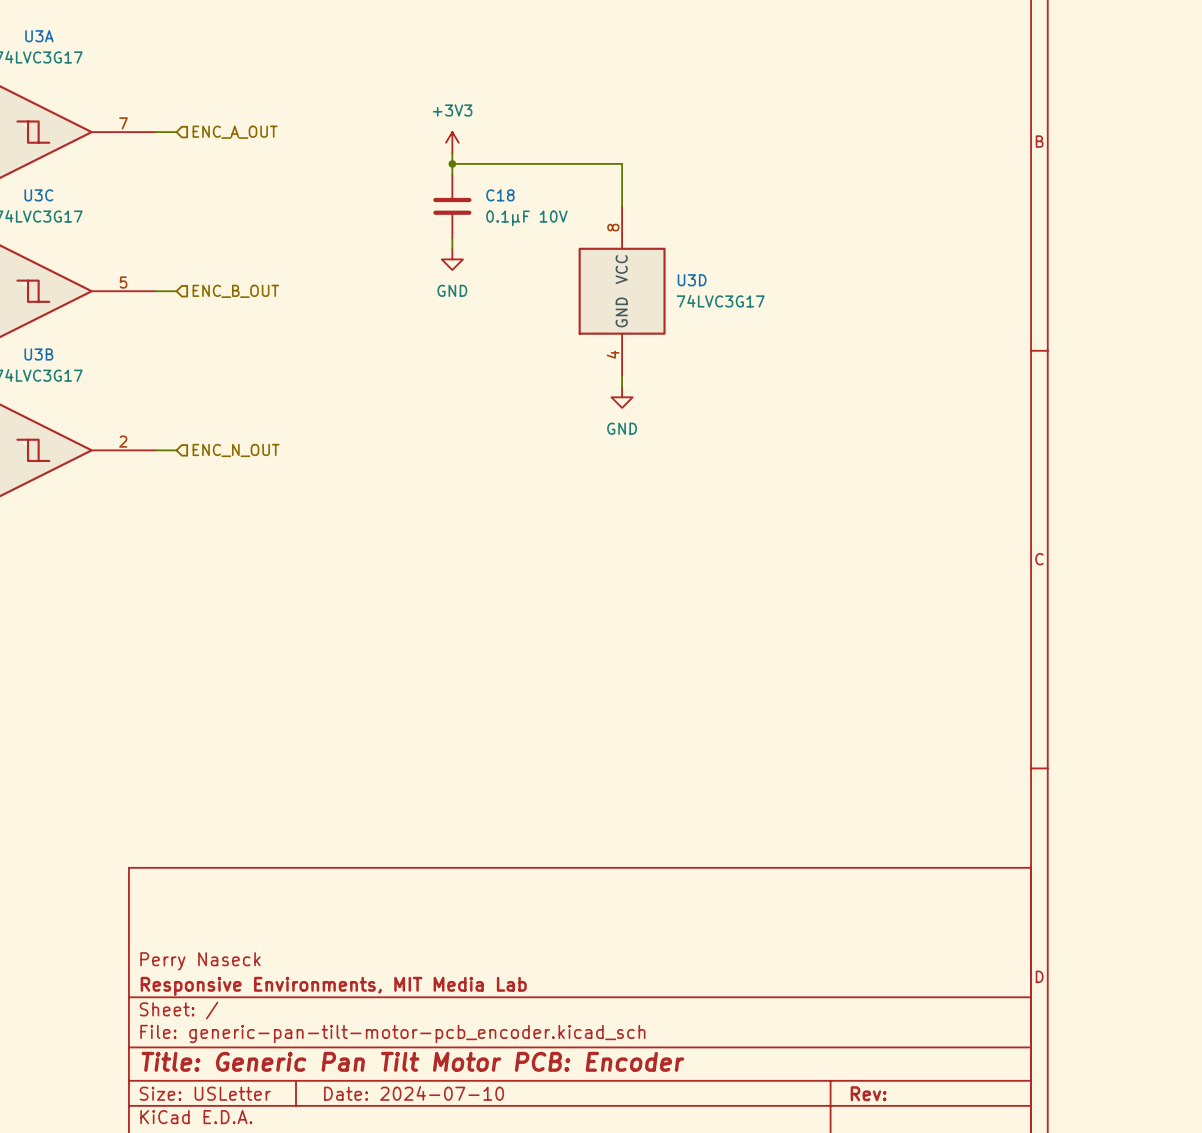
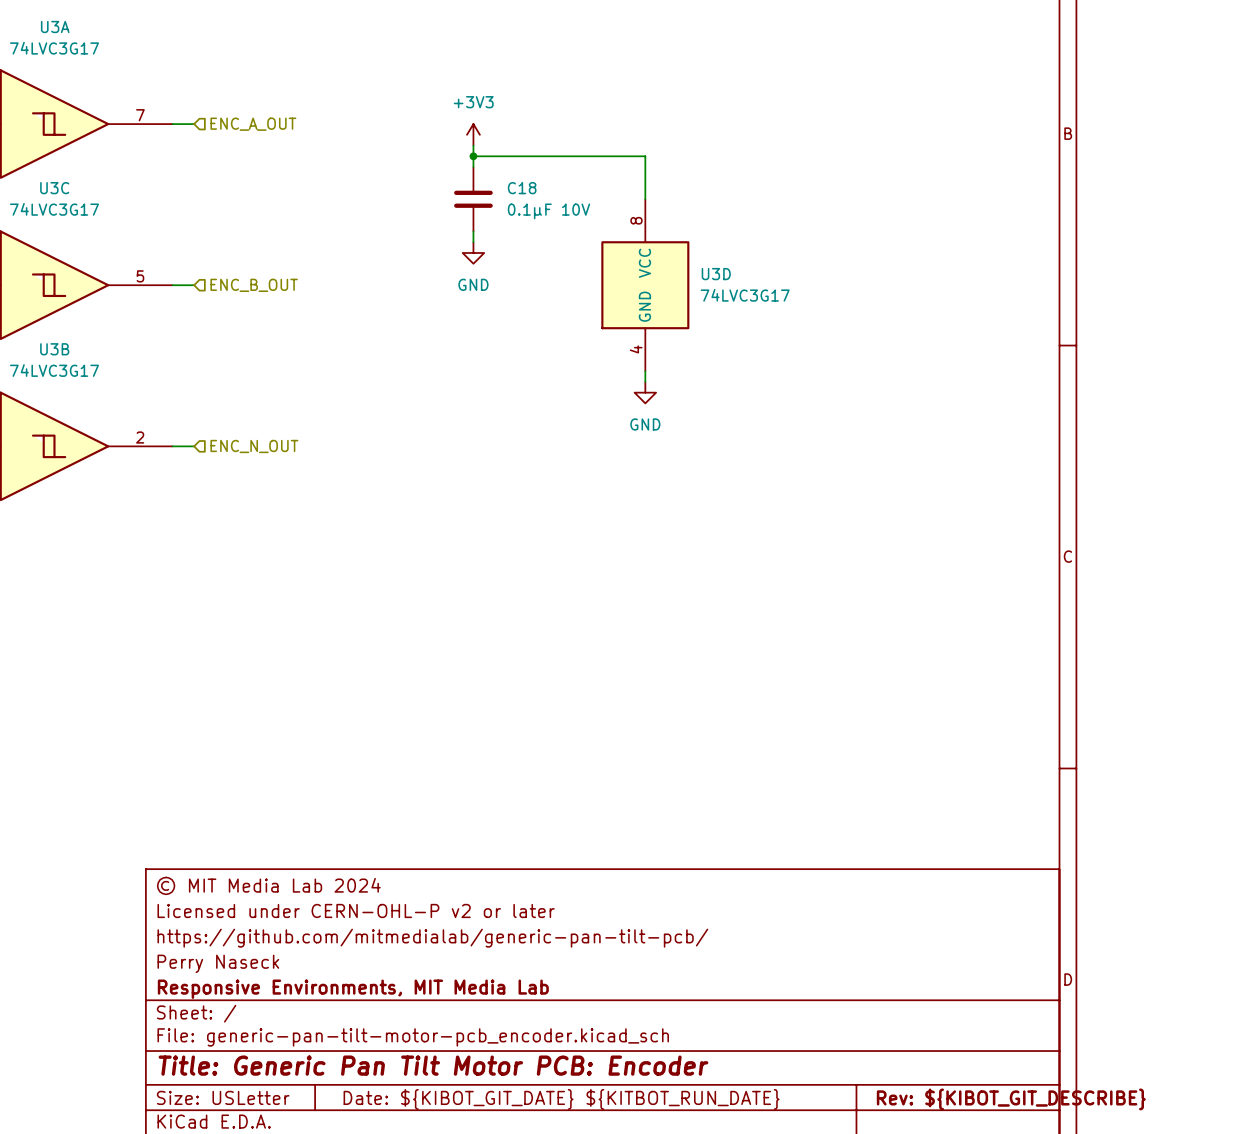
title block: none -> © MIT Media Lab 2024 (268, 885)
title block: none -> Licensed under CERN-OHL-P v2 or later (356, 910)
title block: none -> https://github.com/mitmedialab/generic-pan-tilt-pcb/ (432, 938)
title block: Date: 2024-07-10 (414, 1093) -> Date: ${KIBOT_GIT_DATE} ${KITBOT_RUN_DATE} (561, 1099)
title block: Rev: (868, 1093) -> Rev: ${KIBOT_GIT_DESCRIBE} (1011, 1099)

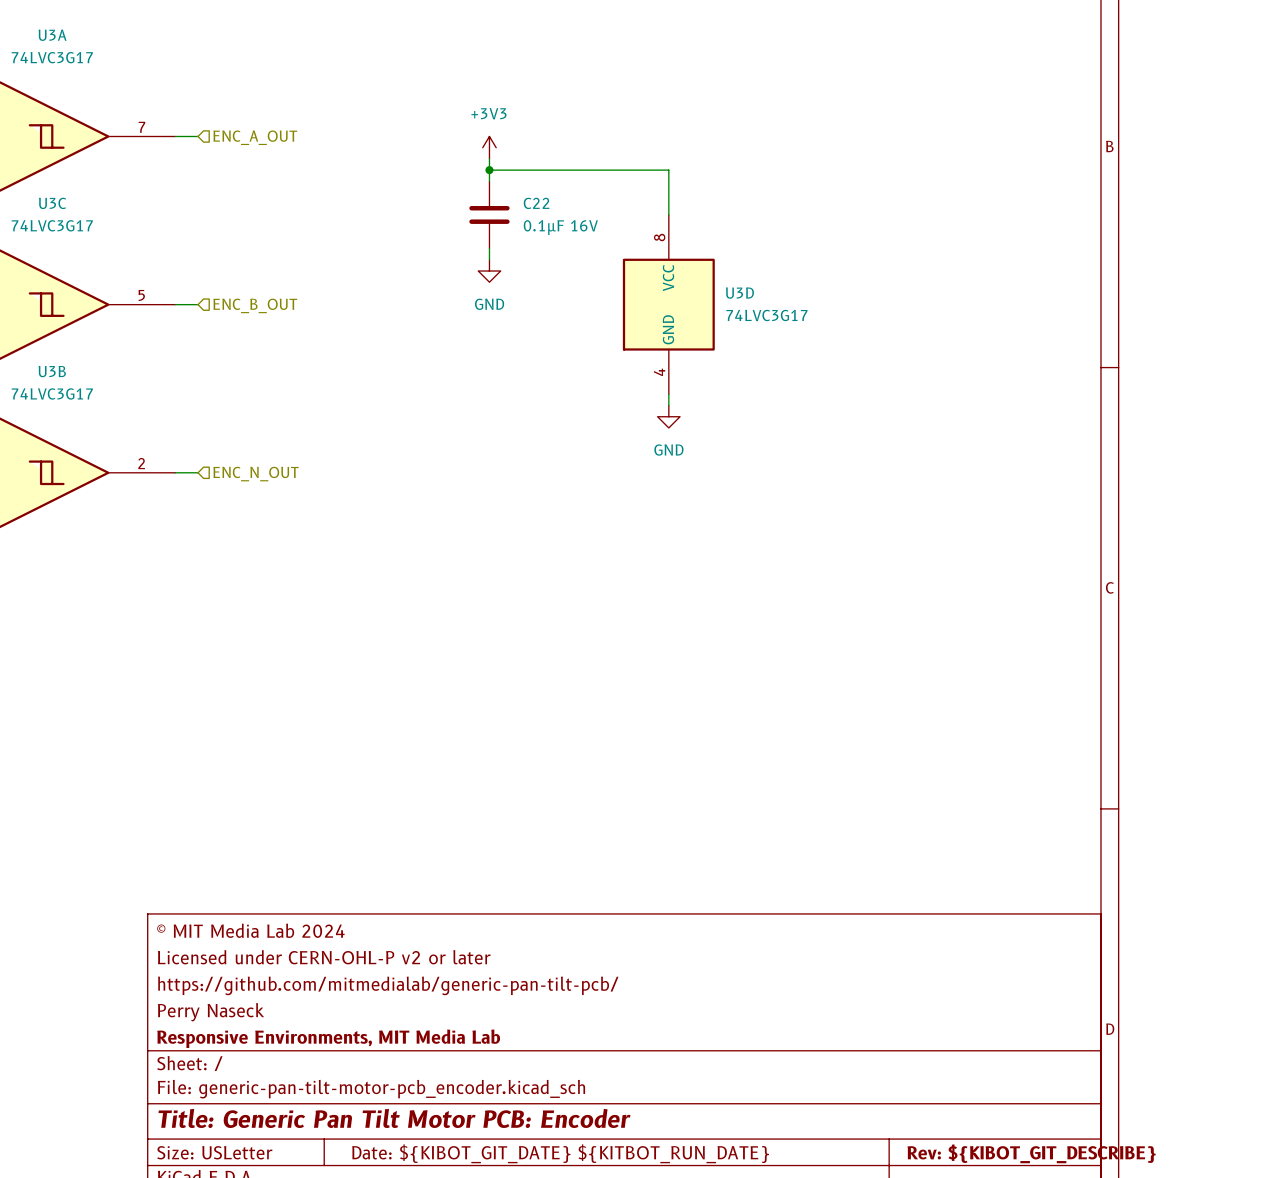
C18 name: C18 (522, 188) -> C22 (536, 203)
C18 value: 0.1µF 10V (548, 211) -> 0.1µF 16V (560, 227)

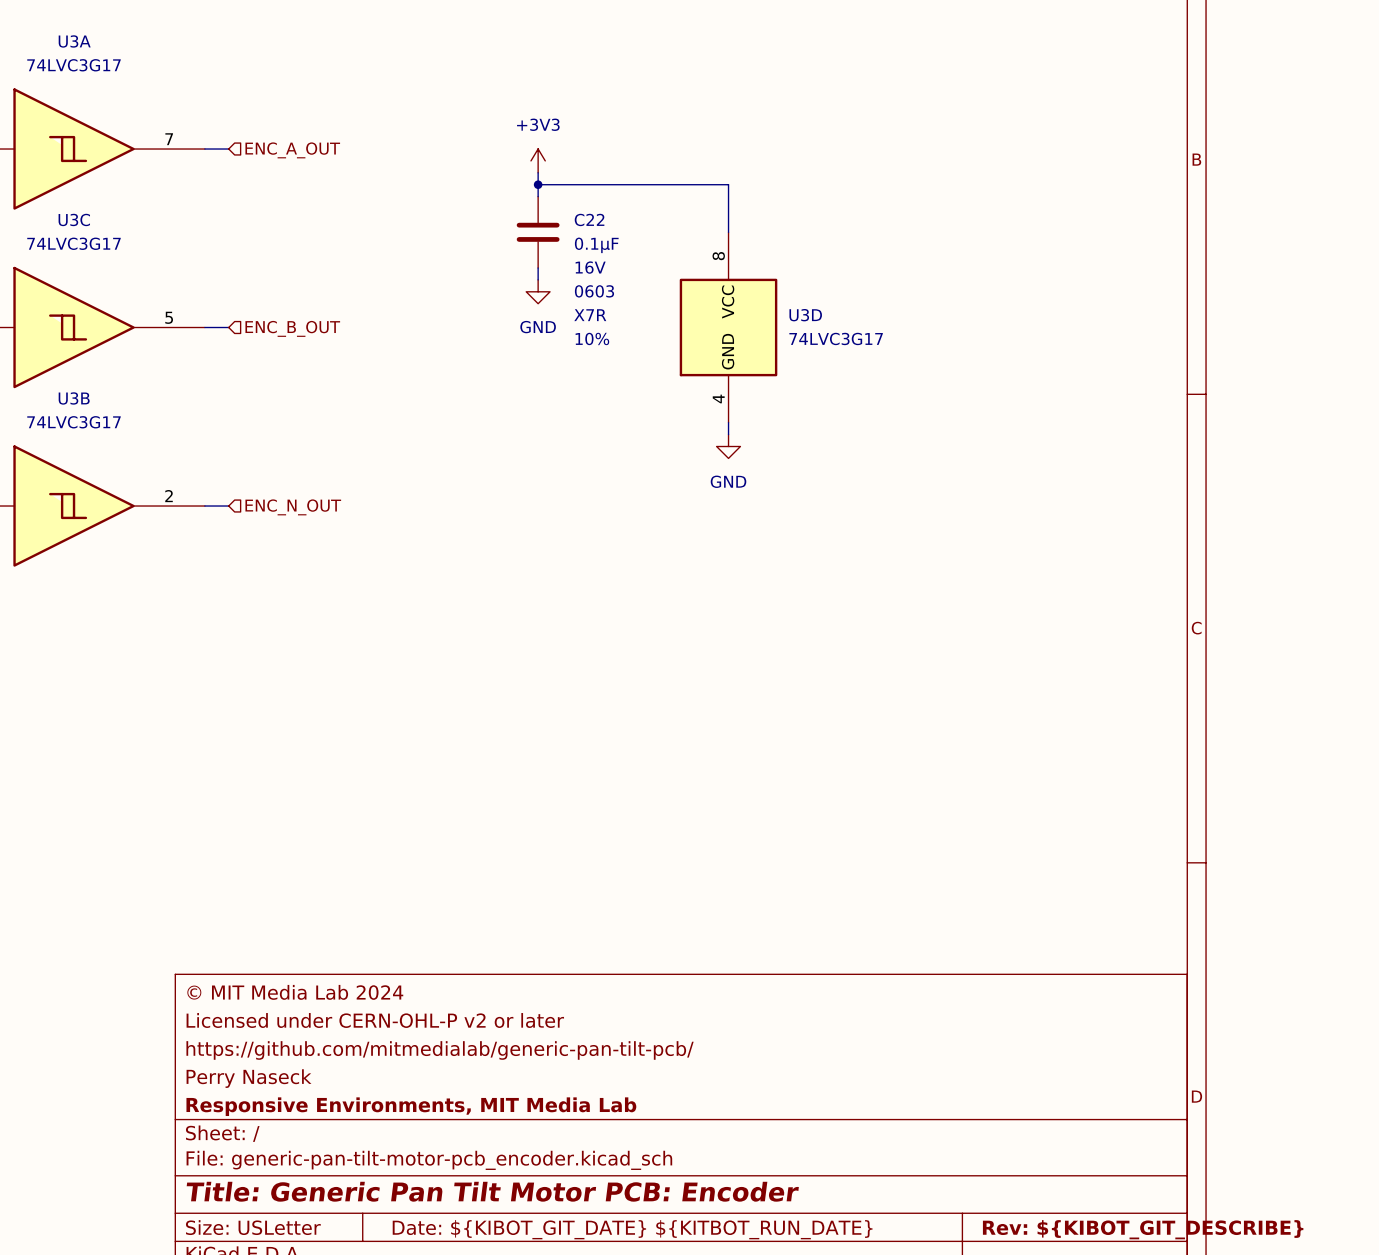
C22 value: 0.1µF 16V (560, 227) -> 0.1µF (596, 245)
C22 text: none -> 16V (590, 267)
C22 text: none -> 0603 (594, 291)
C22 text: none -> X7R (590, 315)
C22 text: none -> 10% (592, 338)

